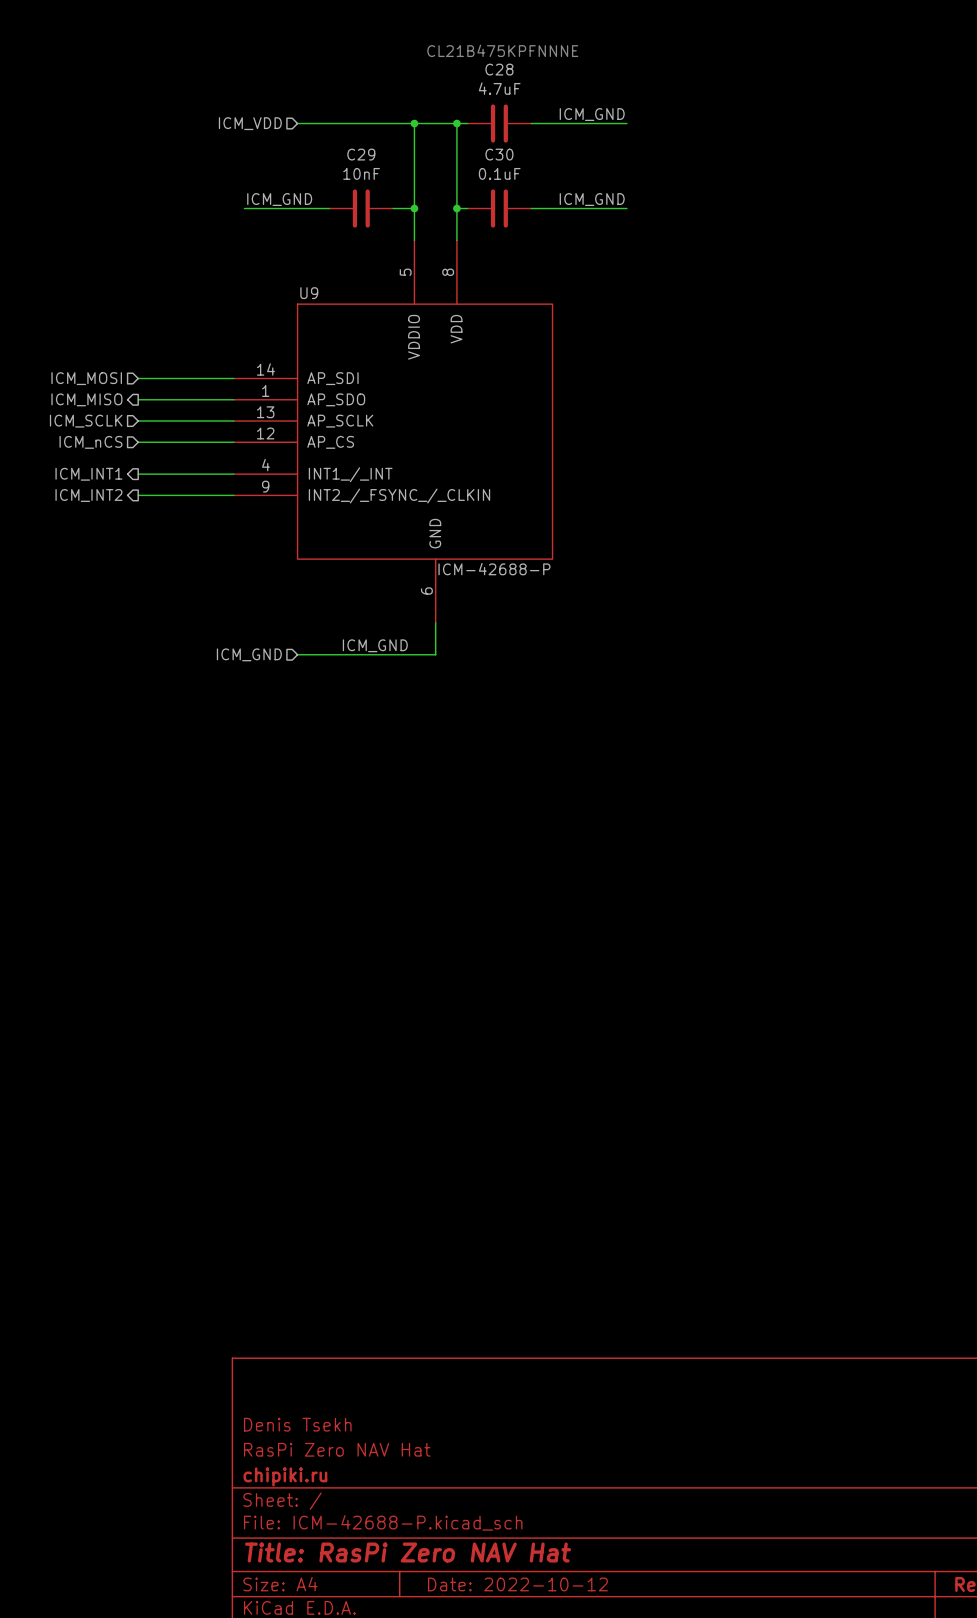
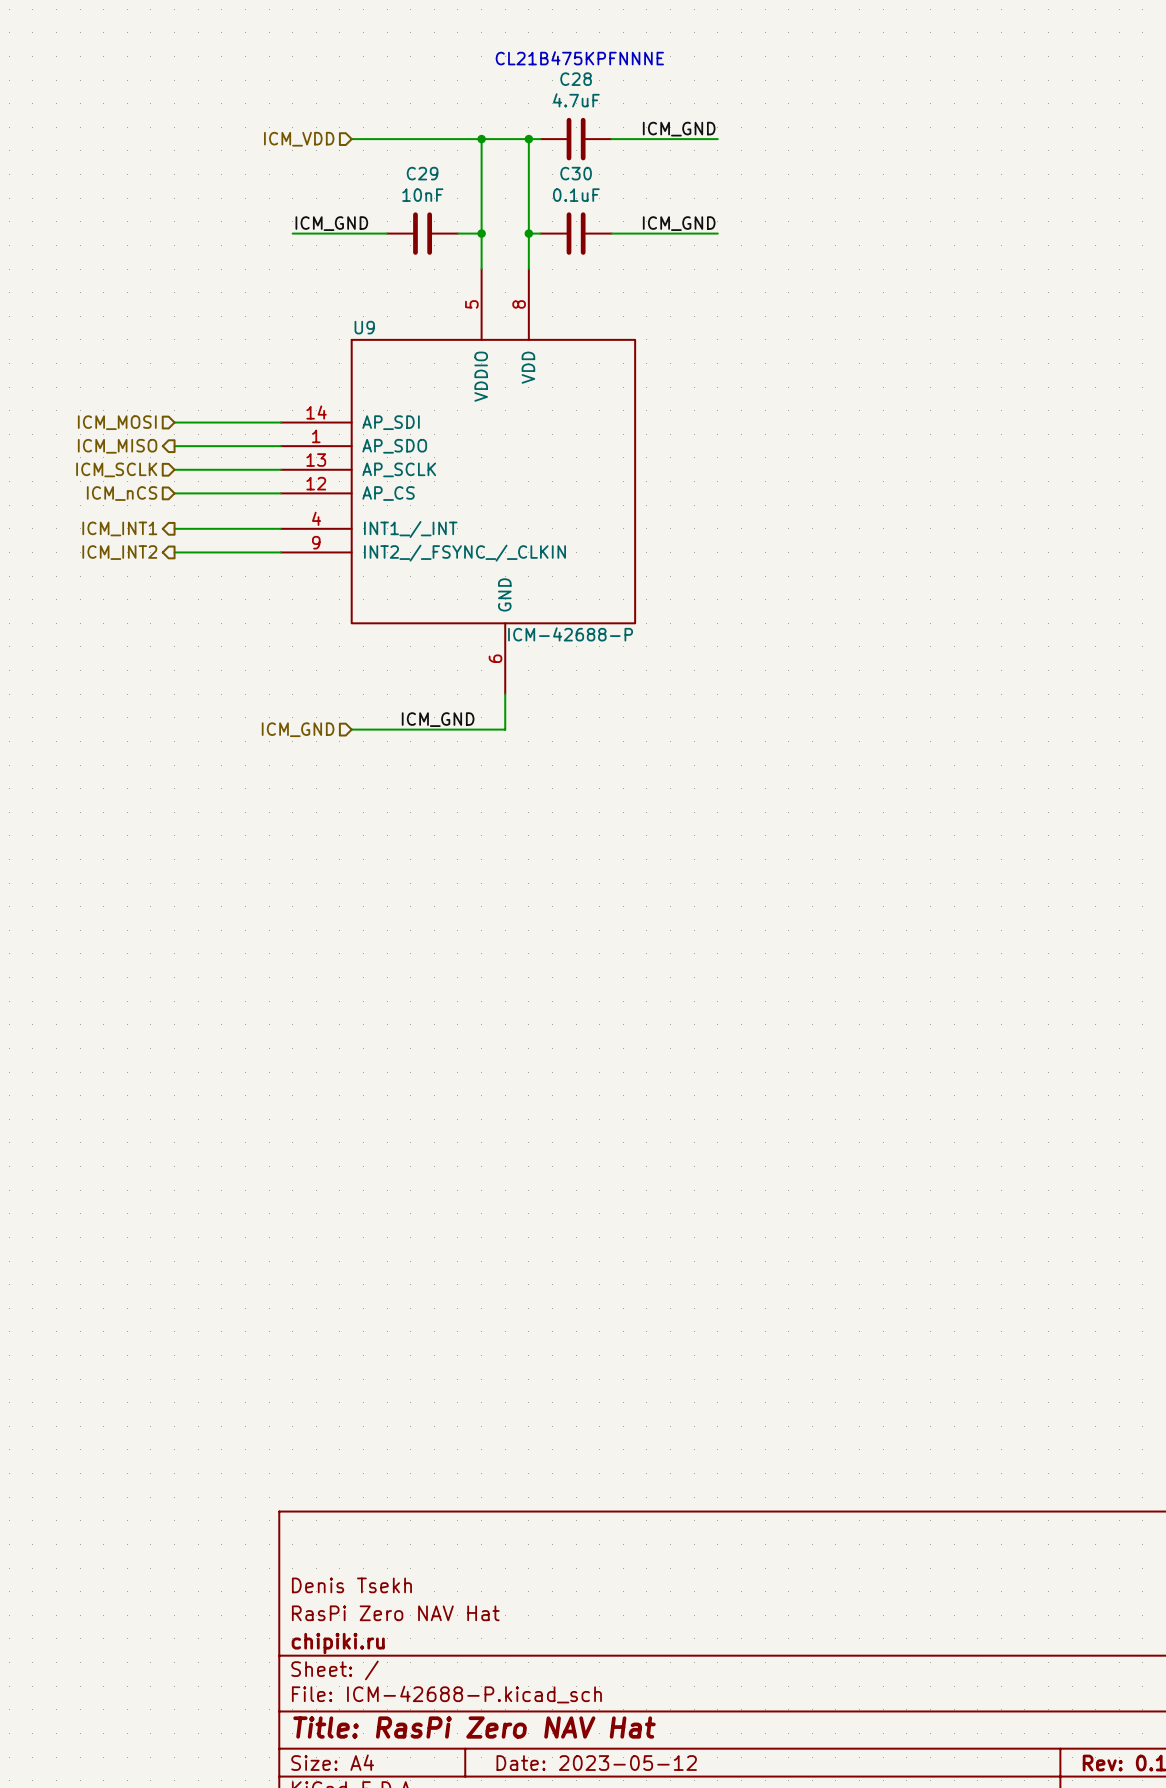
title block: Date: 2022-10-12 (517, 1584) -> Date: 2023-05-12 (596, 1763)

